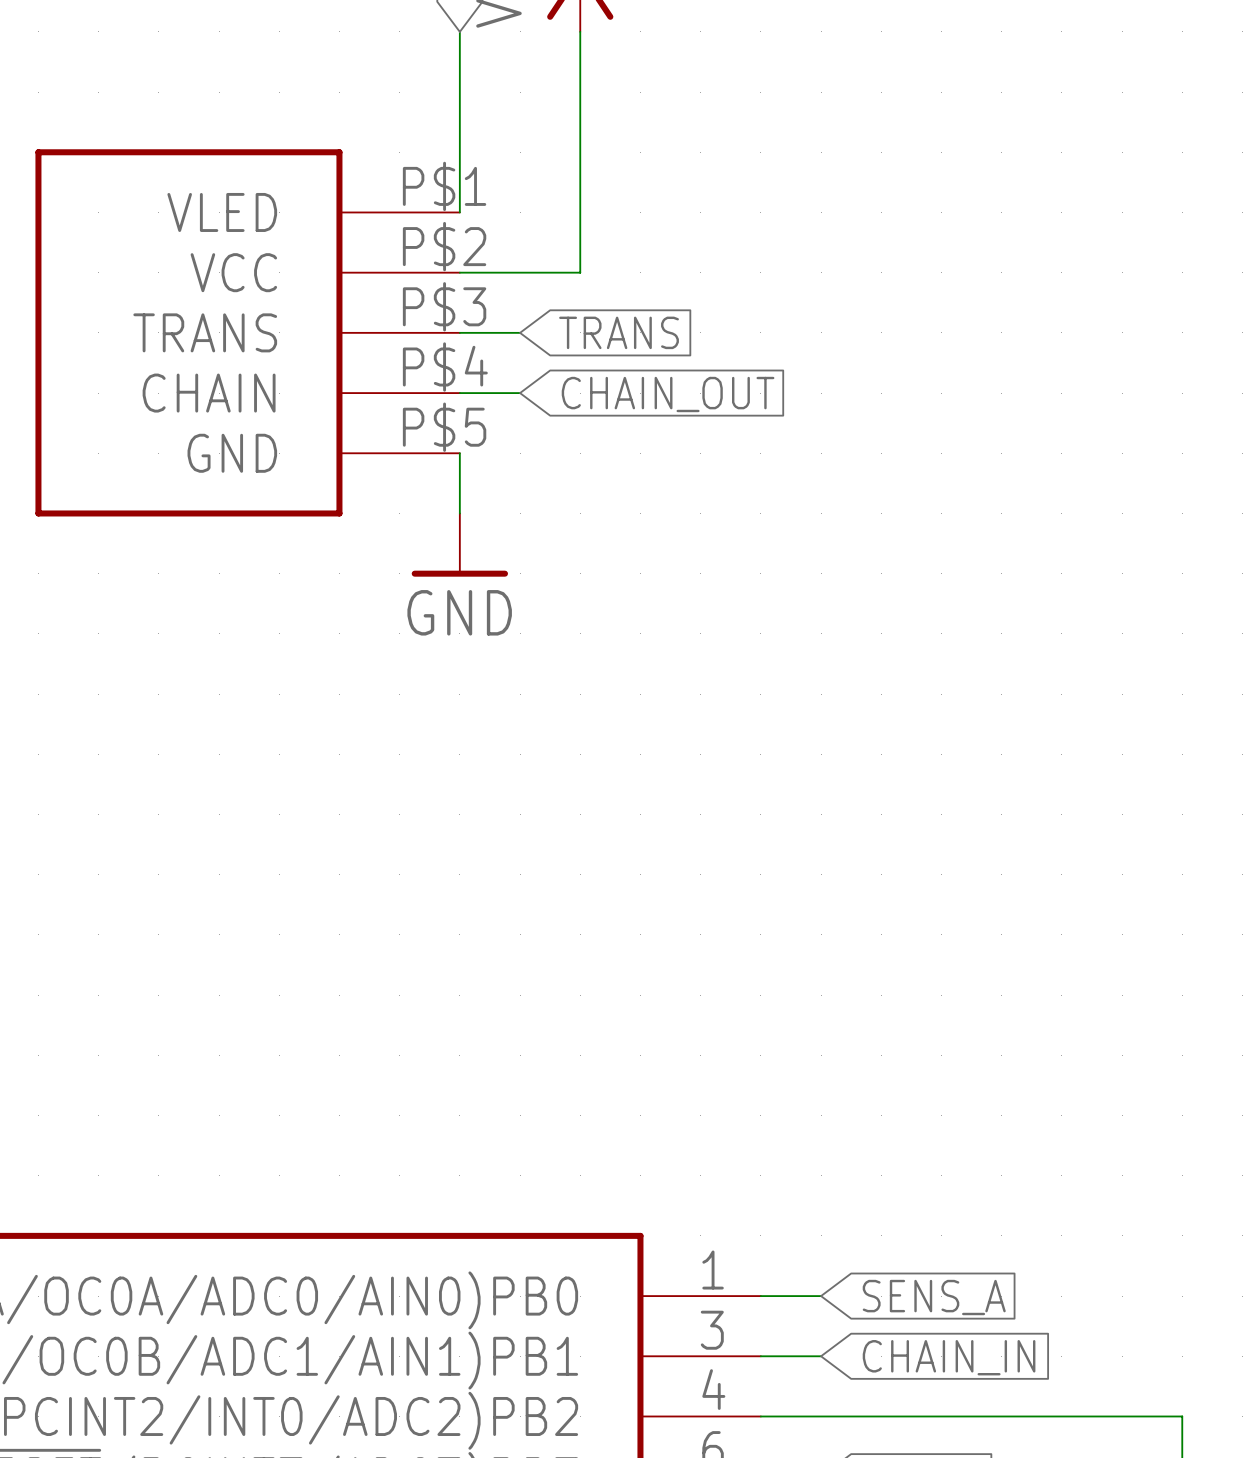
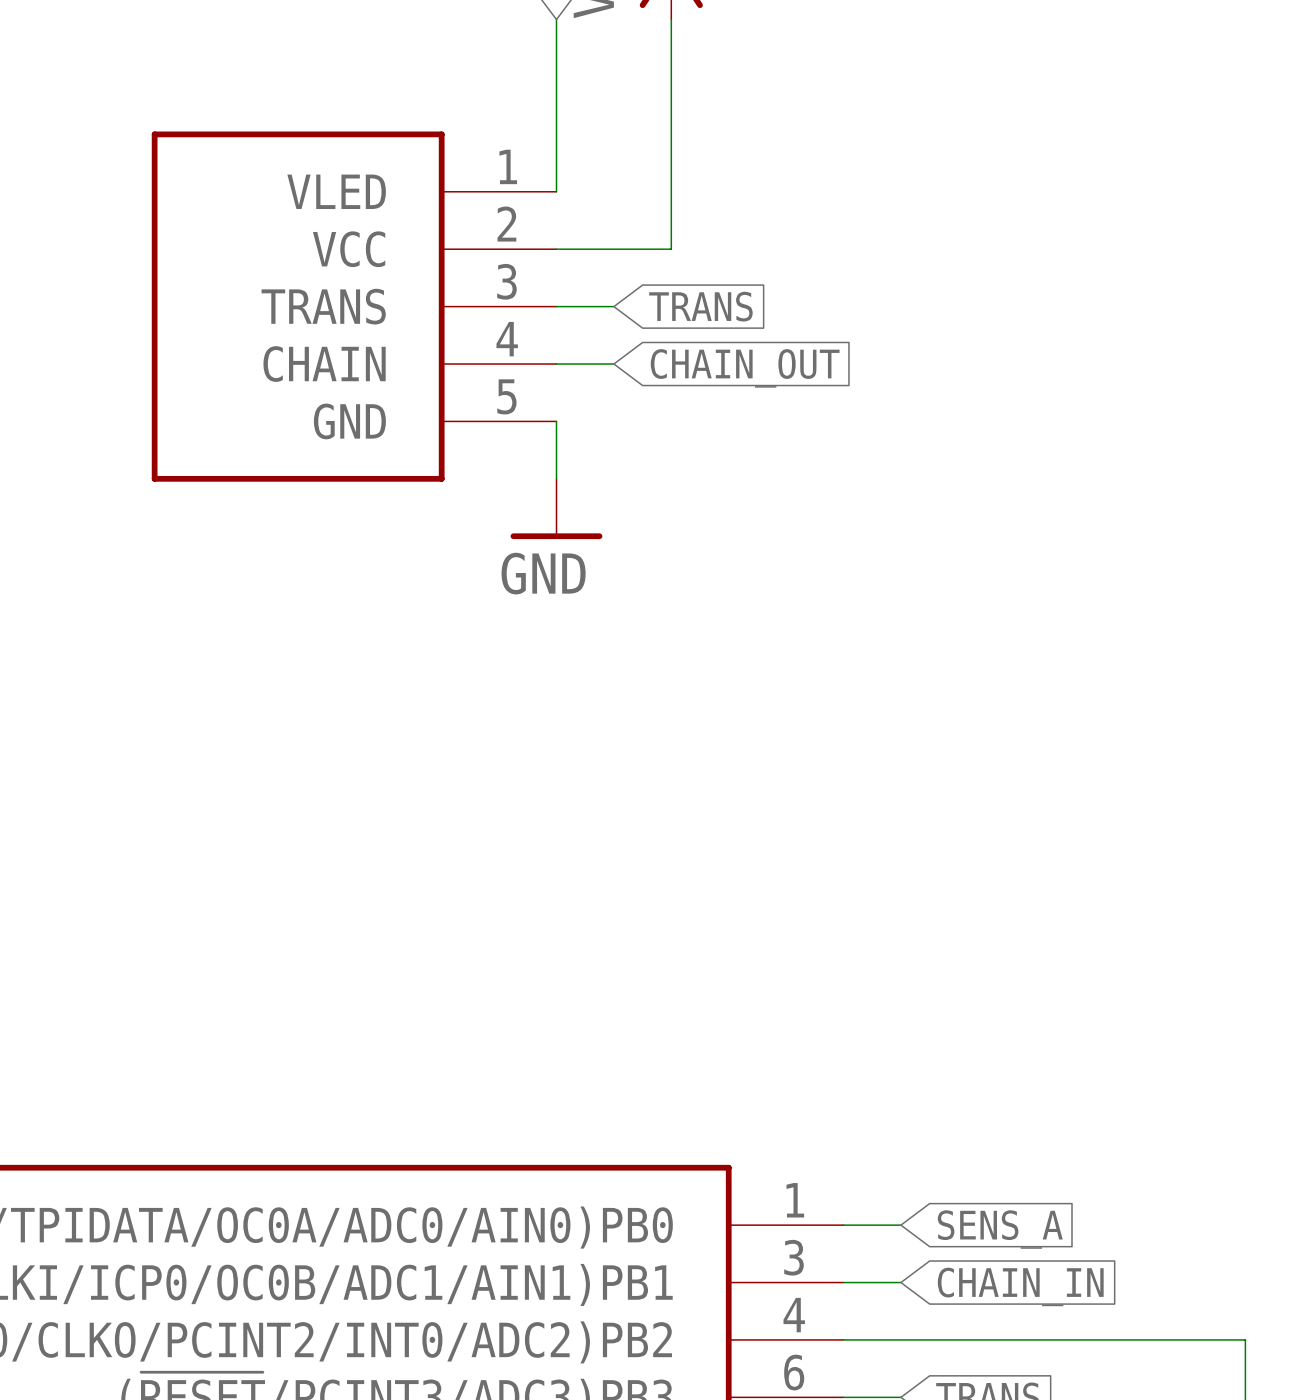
part pin number: P$1 (444, 186) -> 1 (508, 166)
part pin number: P$2 (444, 246) -> 2 (506, 224)
part pin number: P$3 (444, 306) -> 3 (506, 281)
part pin number: P$4 (445, 367) -> 4 (507, 339)
part pin number: P$5 (444, 427) -> 5 (506, 396)

